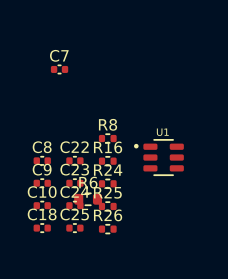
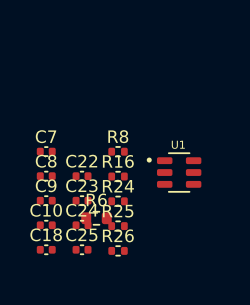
C7 position: (59, 69) -> (46, 151)

